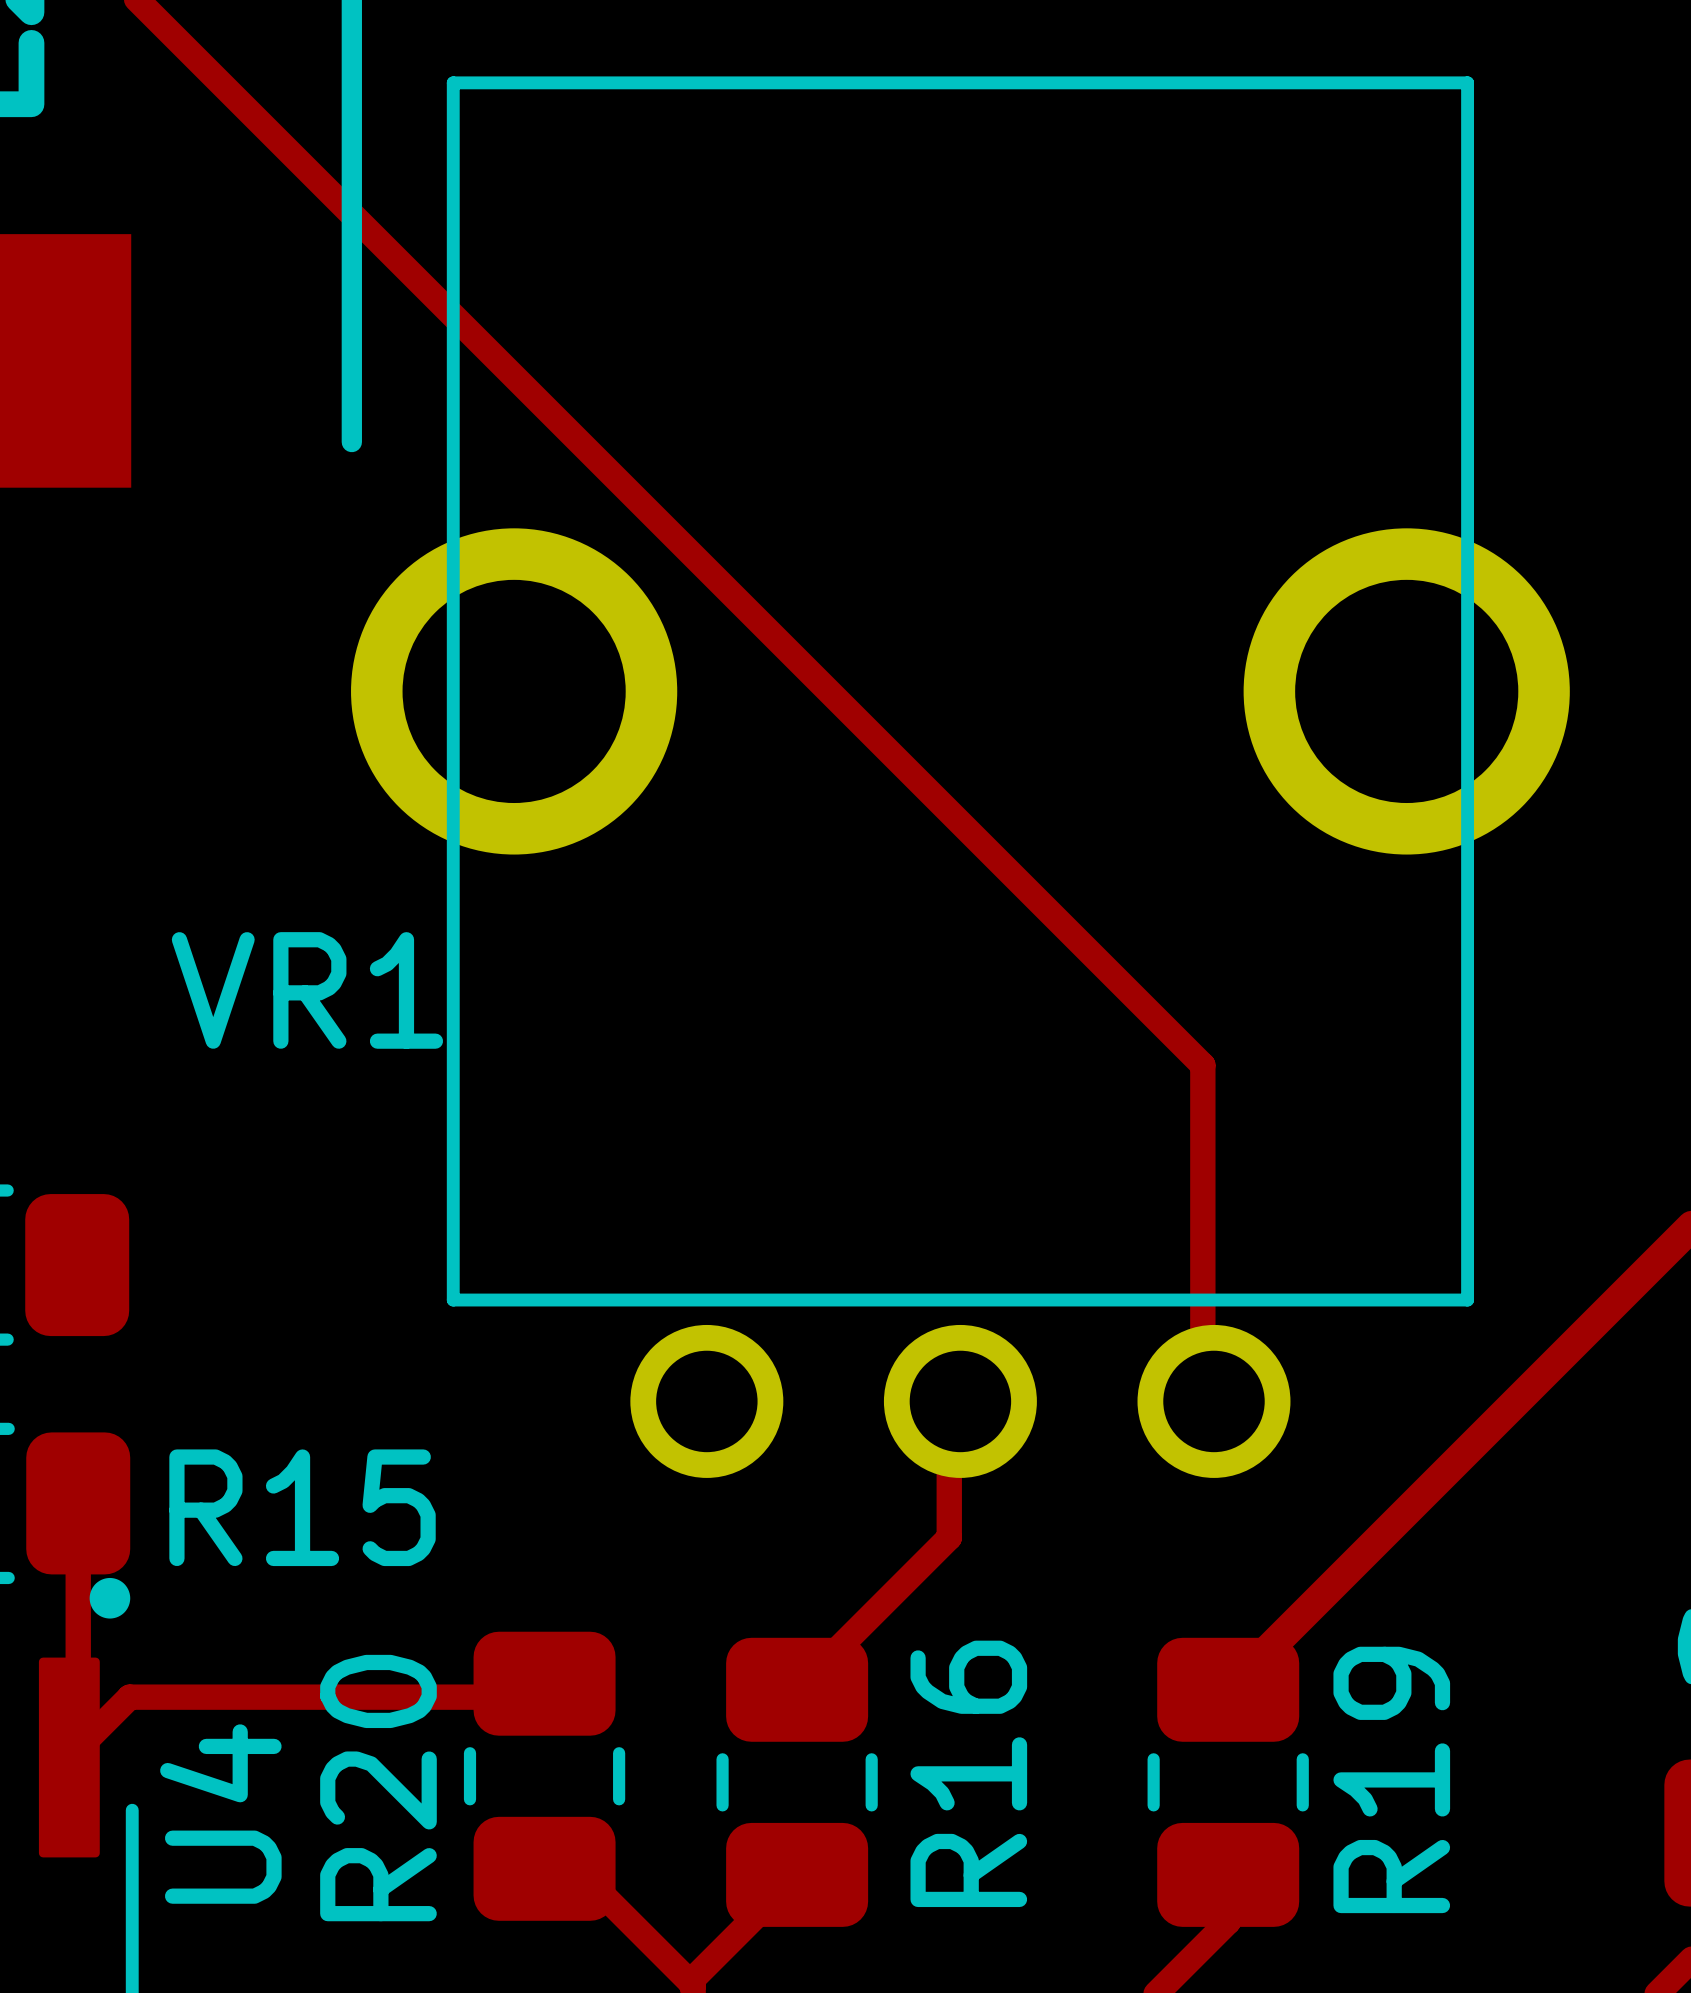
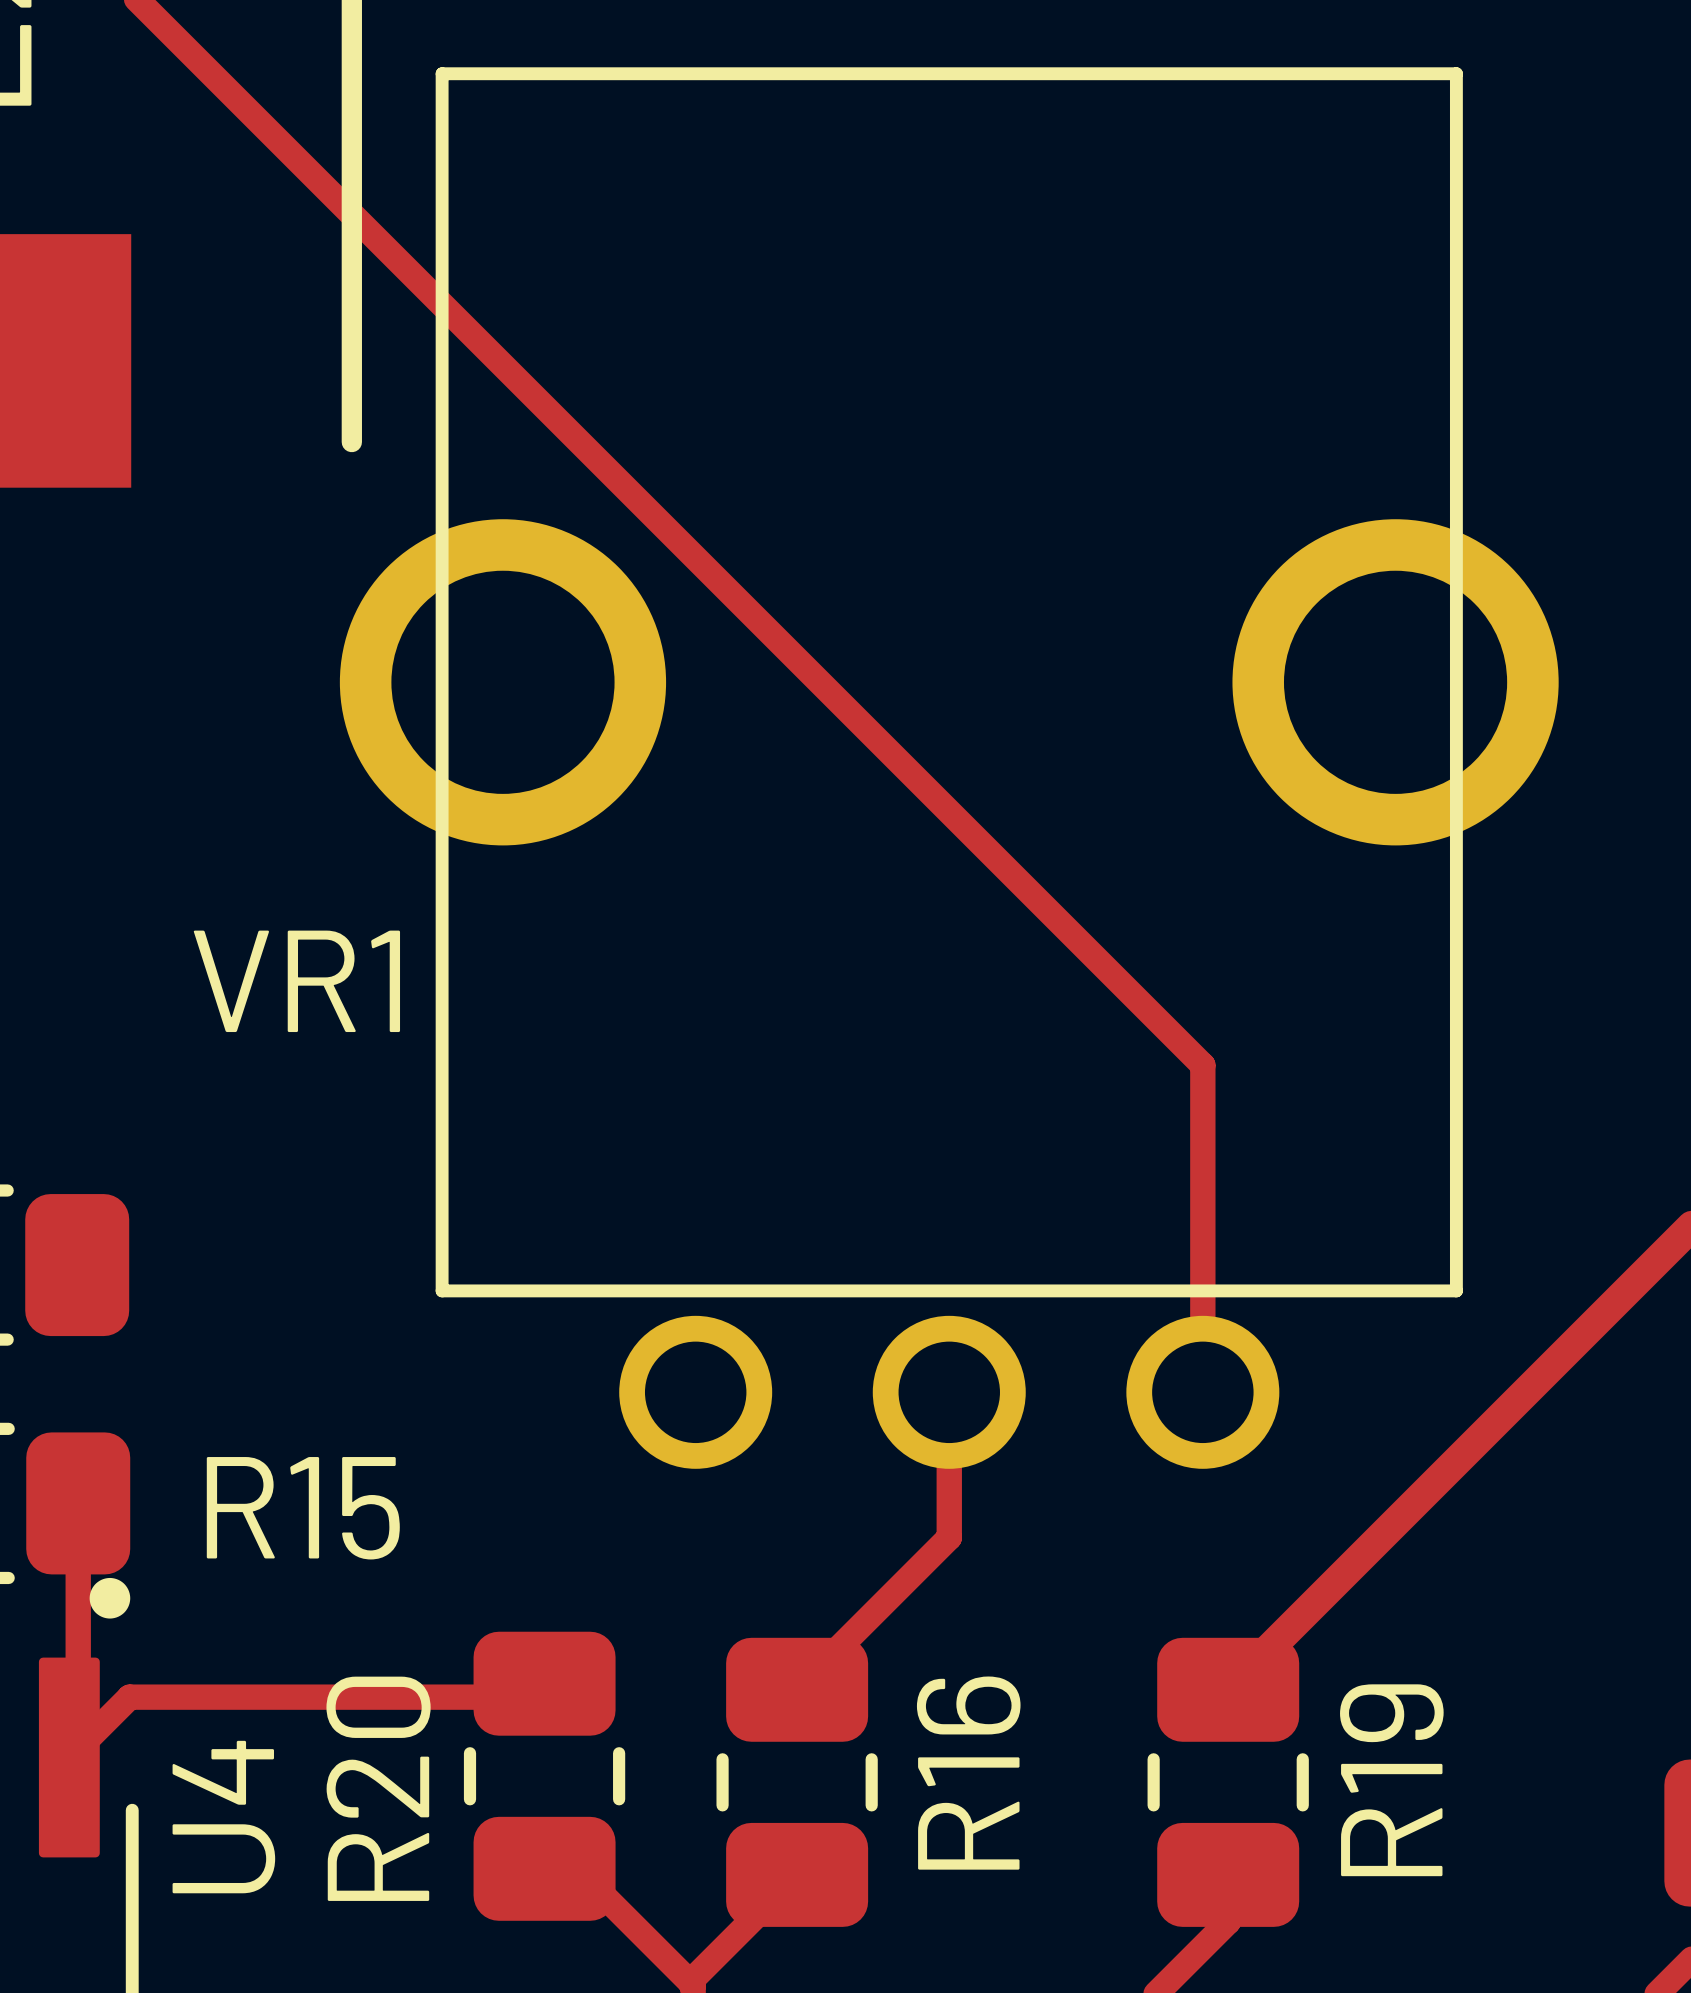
VR1 position: (960, 777) -> (949, 768)

